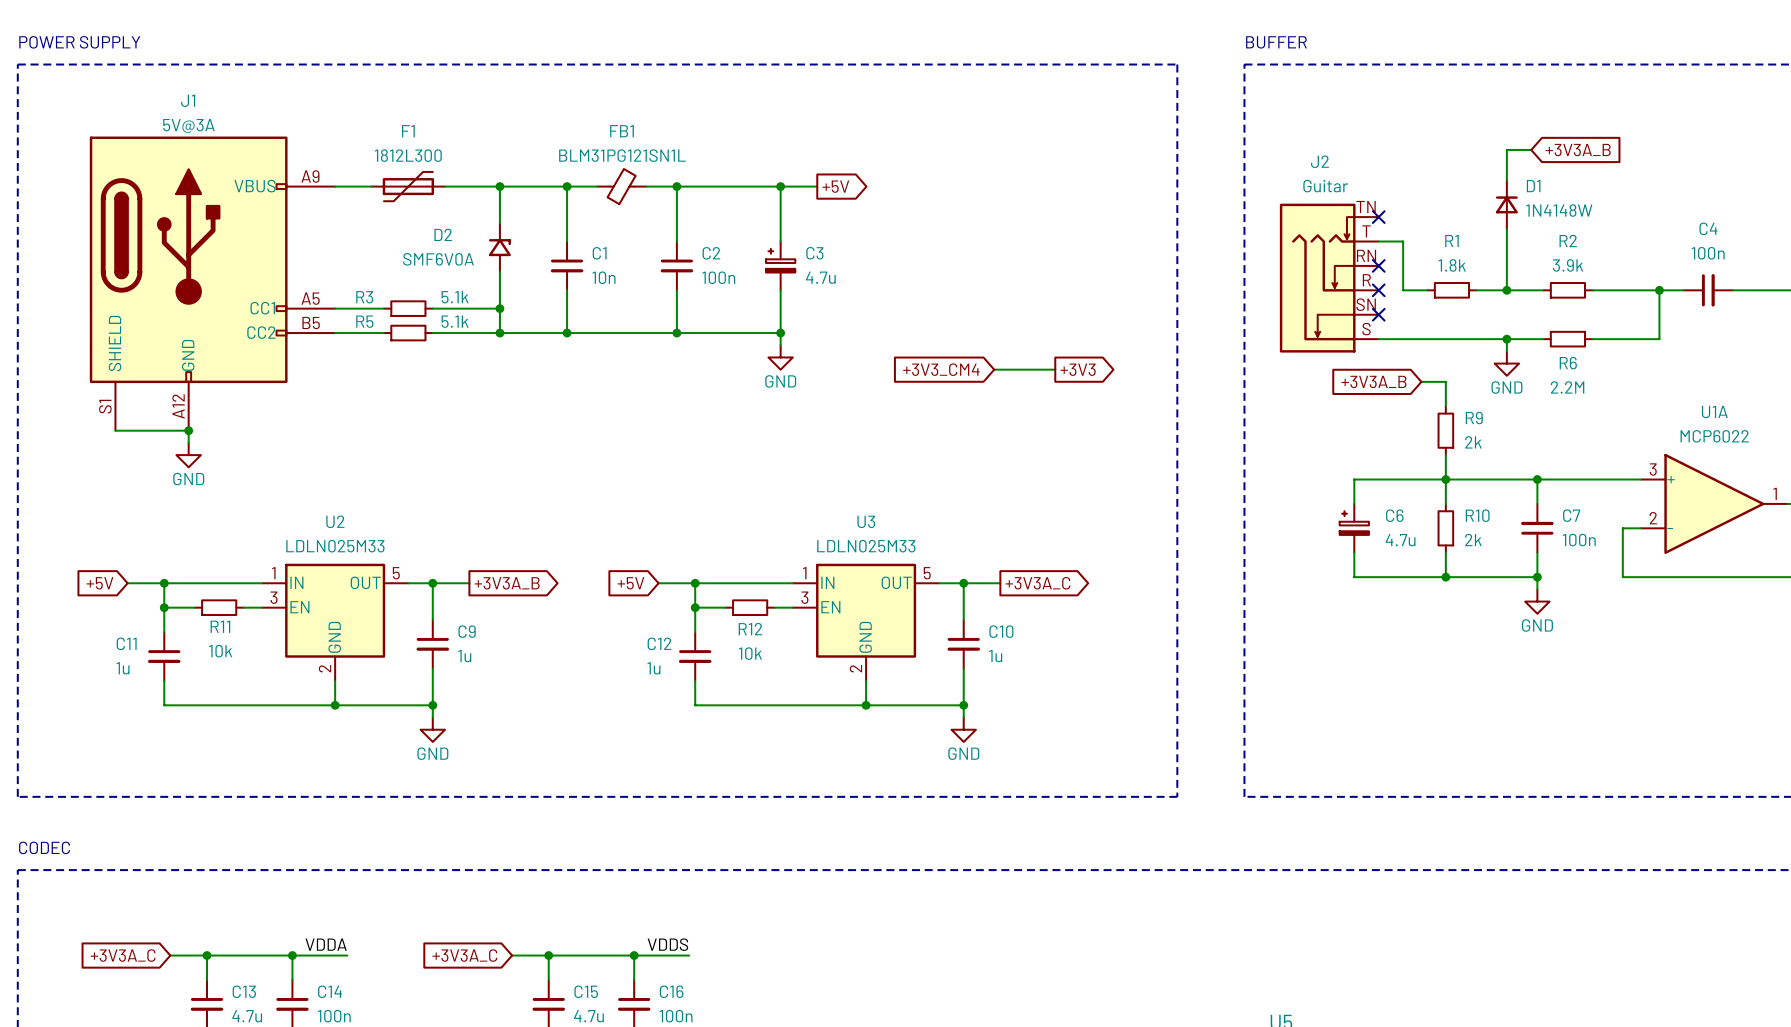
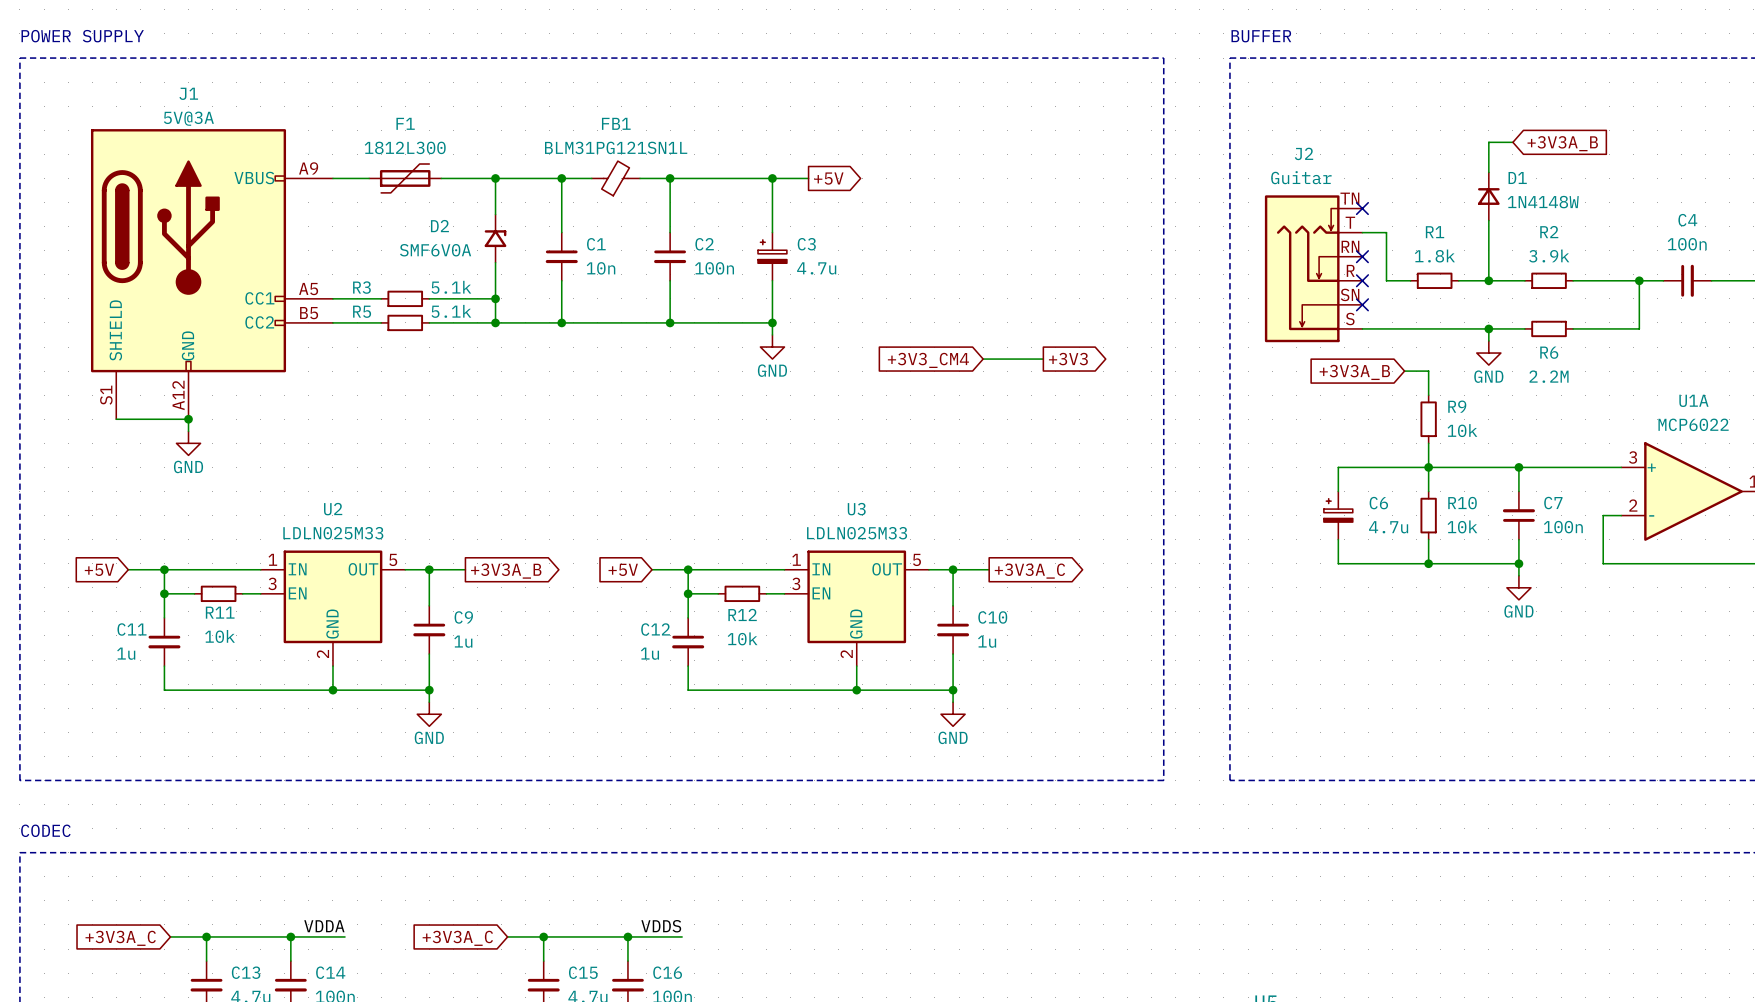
R9 value: 2k (1473, 442) -> 10k (1462, 430)
R10 value: 2k (1473, 540) -> 10k (1462, 526)

